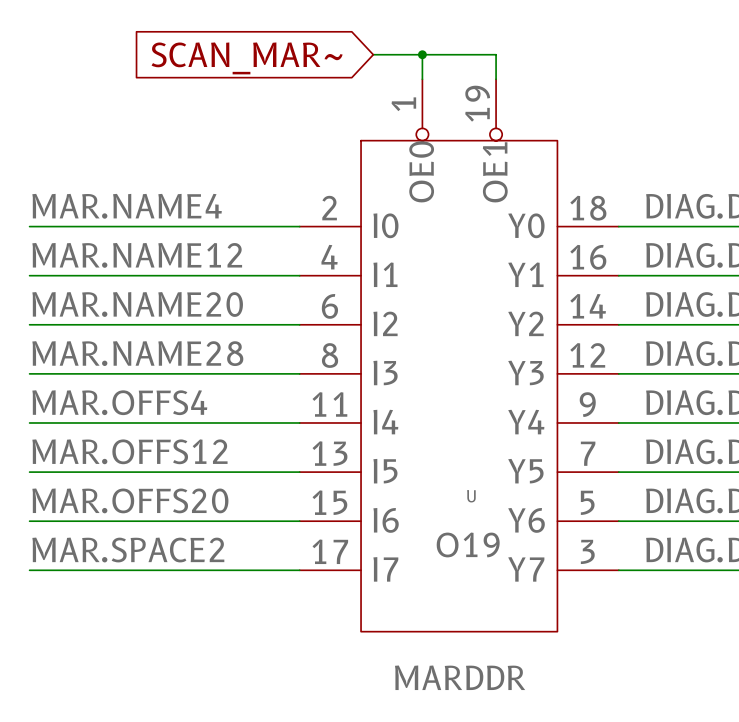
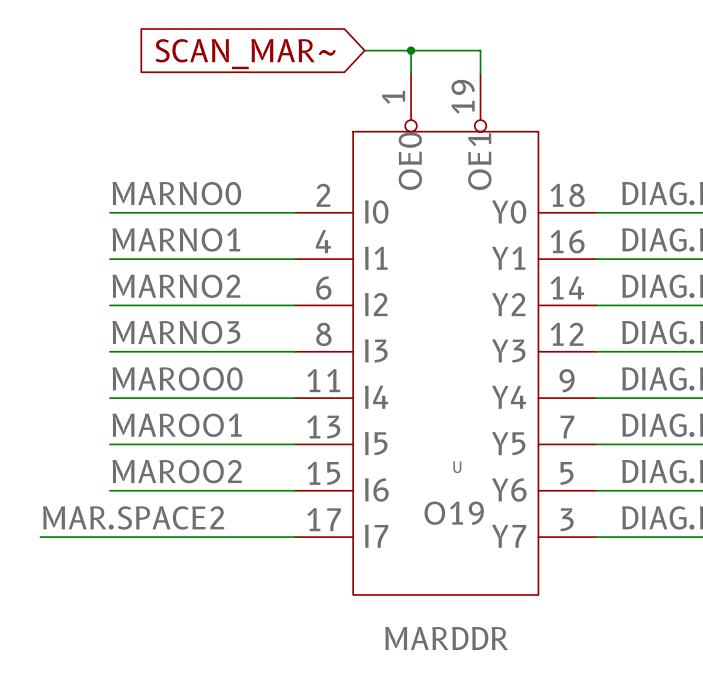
label: MAR.NAME4 (127, 206) -> none
label: none -> MARNO0 (176, 193)
wire: (29, 226) (103, 226) -> none
label: MAR.NAME12 (137, 255) -> none
label: none -> MARNO1 (176, 239)
wire: (29, 275) (103, 275) -> none
label: MAR.NAME20 (137, 304) -> none
label: none -> MARNO2 (176, 286)
wire: (29, 324) (103, 324) -> none
label: MAR.NAME28 (137, 353) -> none
label: none -> MARNO3 (176, 332)
wire: (29, 373) (103, 373) -> none
label: MAR.OFFS4 (119, 402) -> none
label: none -> MAROO0 (177, 378)
wire: (29, 422) (103, 422) -> none
label: MAR.OFFS12 (129, 451) -> none
label: none -> MAROO1 (177, 425)
wire: (29, 472) (103, 472) -> none
label: MAR.OFFS20 (130, 500) -> none
label: none -> MAROO2 (177, 471)
wire: (29, 521) (103, 521) -> none

